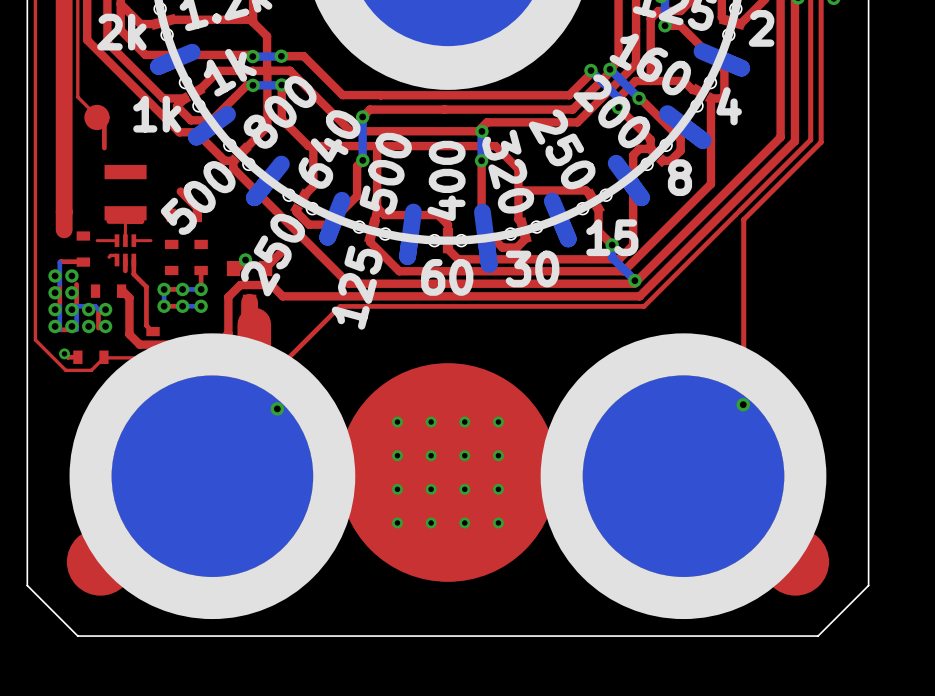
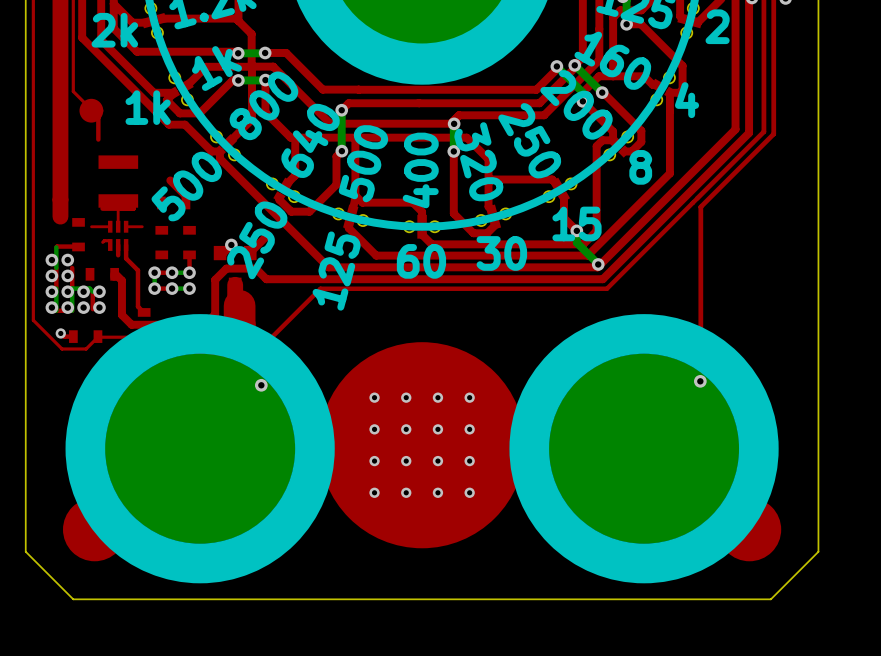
bottom track: (702, 51) (741, 68) (719, 58) -> none
bottom track: (192, 52) (158, 66) (176, 58) -> none
bottom track: (667, 113) (702, 140) (681, 124) -> none
bottom track: (227, 114) (196, 137) (214, 124) -> none
bottom track: (616, 163) (641, 197) (627, 179) -> none
bottom track: (281, 164) (254, 197) (268, 180) -> none
bottom track: (341, 200) (327, 237) (335, 217) -> none
bottom track: (552, 201) (568, 238) (559, 218) -> none
bottom track: (413, 212) (407, 256) (410, 238) -> none
bottom track: (482, 212) (489, 264) -> none

